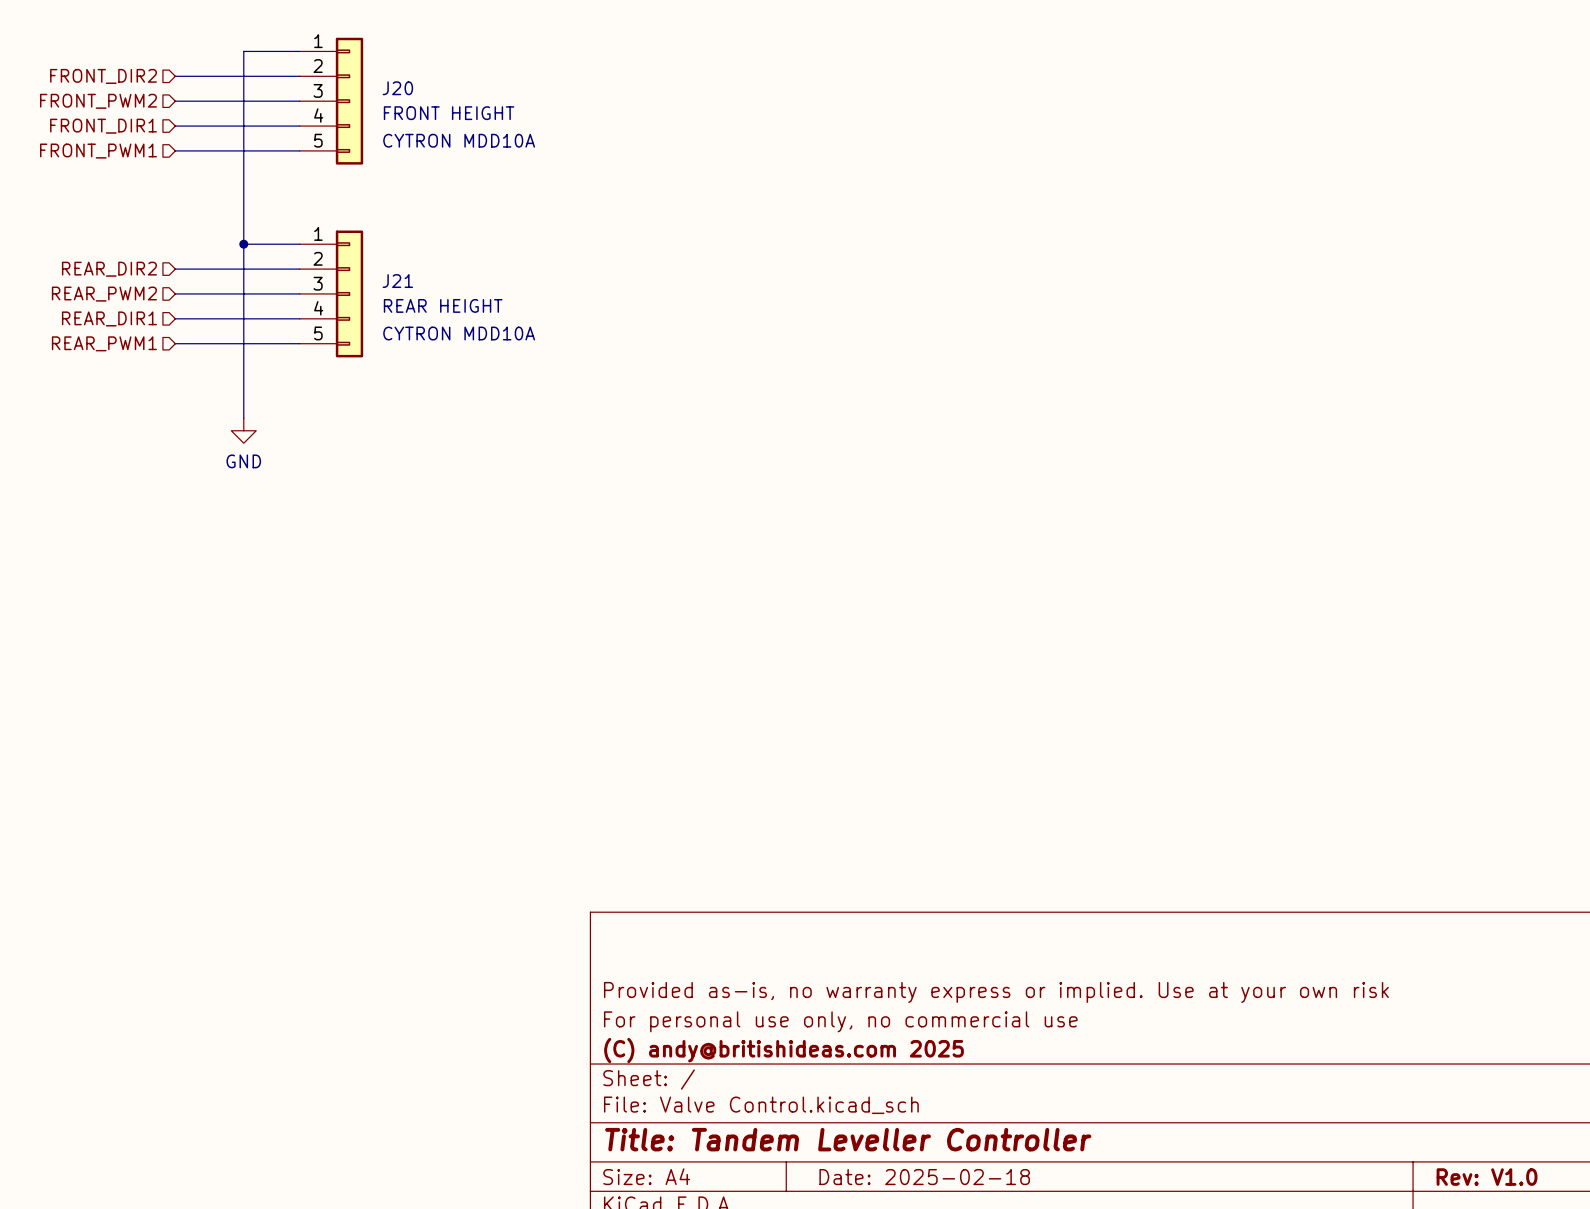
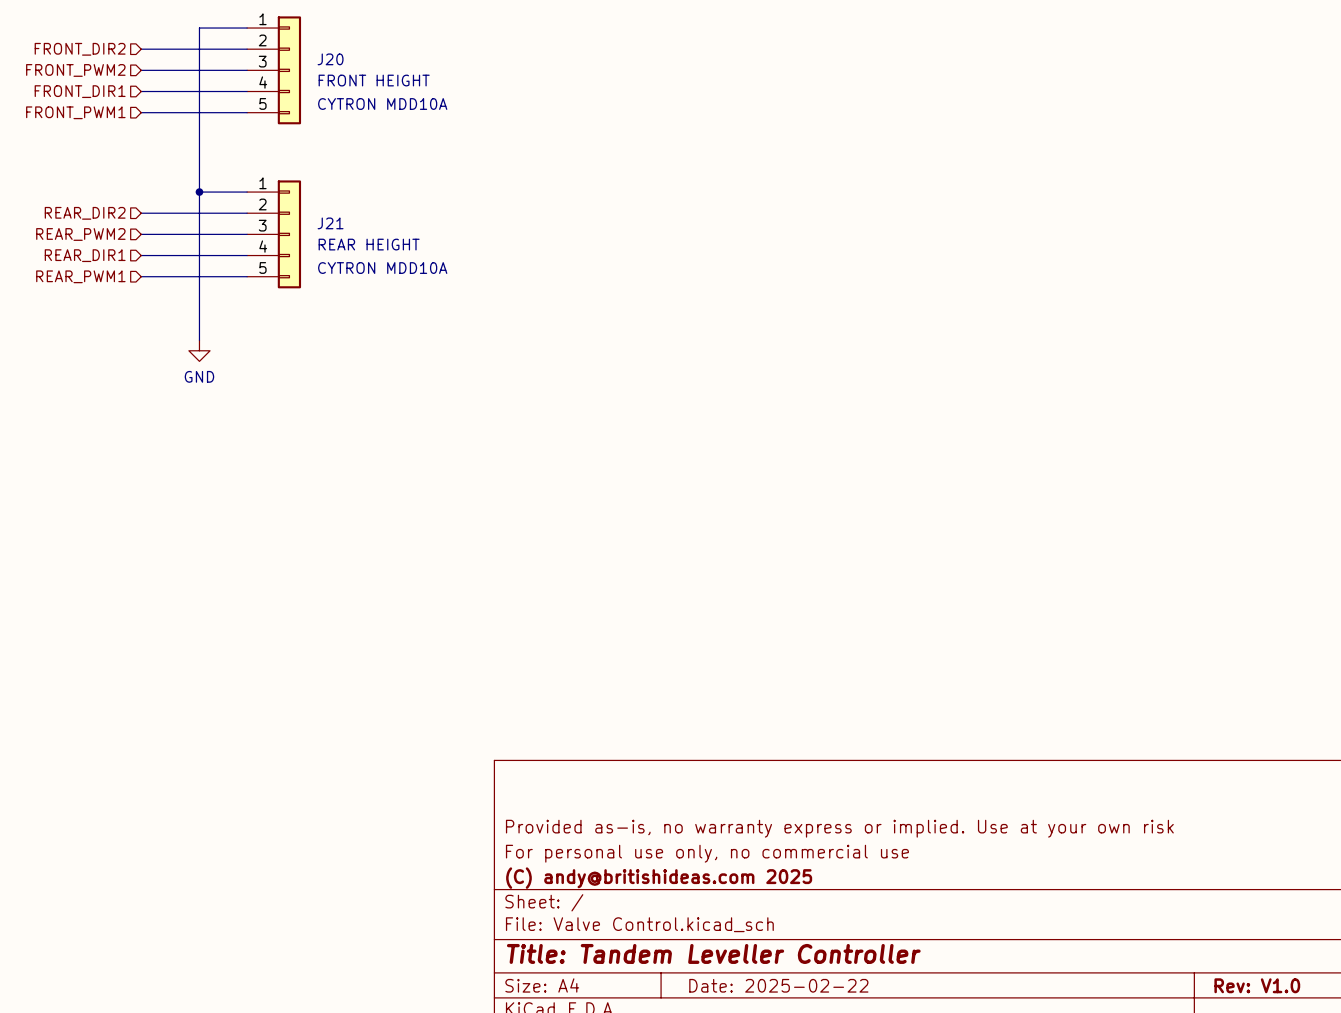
title block: Date: 2025-02-18 (924, 1177) -> Date: 2025-02-22 (778, 985)

